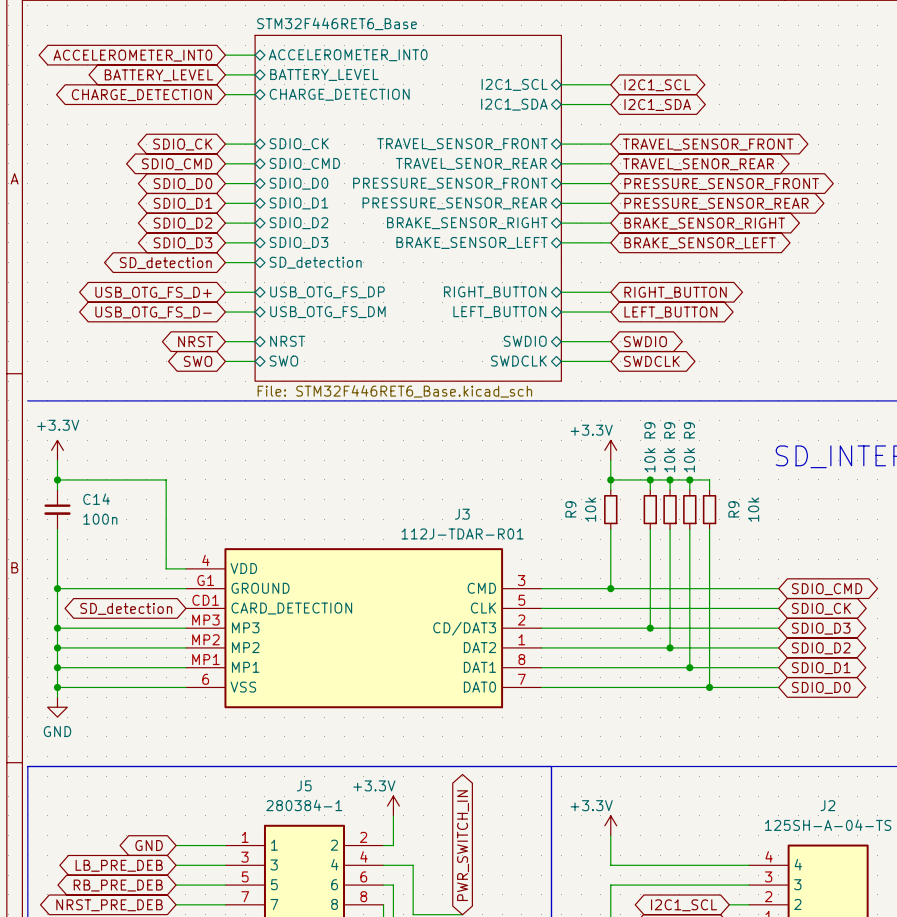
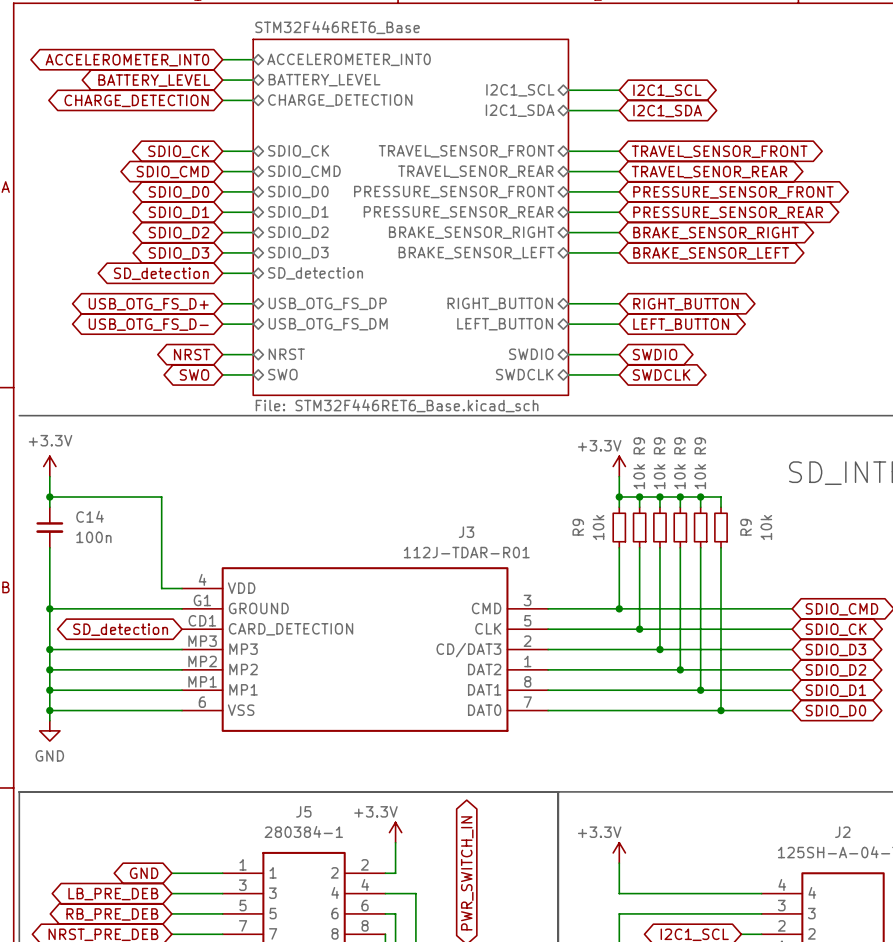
wire: none -> (639, 497) (639, 507)
junction: none -> (639, 497)
R9: none -> 10k (639, 527)
wire: none -> (639, 547) (639, 629)
junction: none -> (639, 629)

